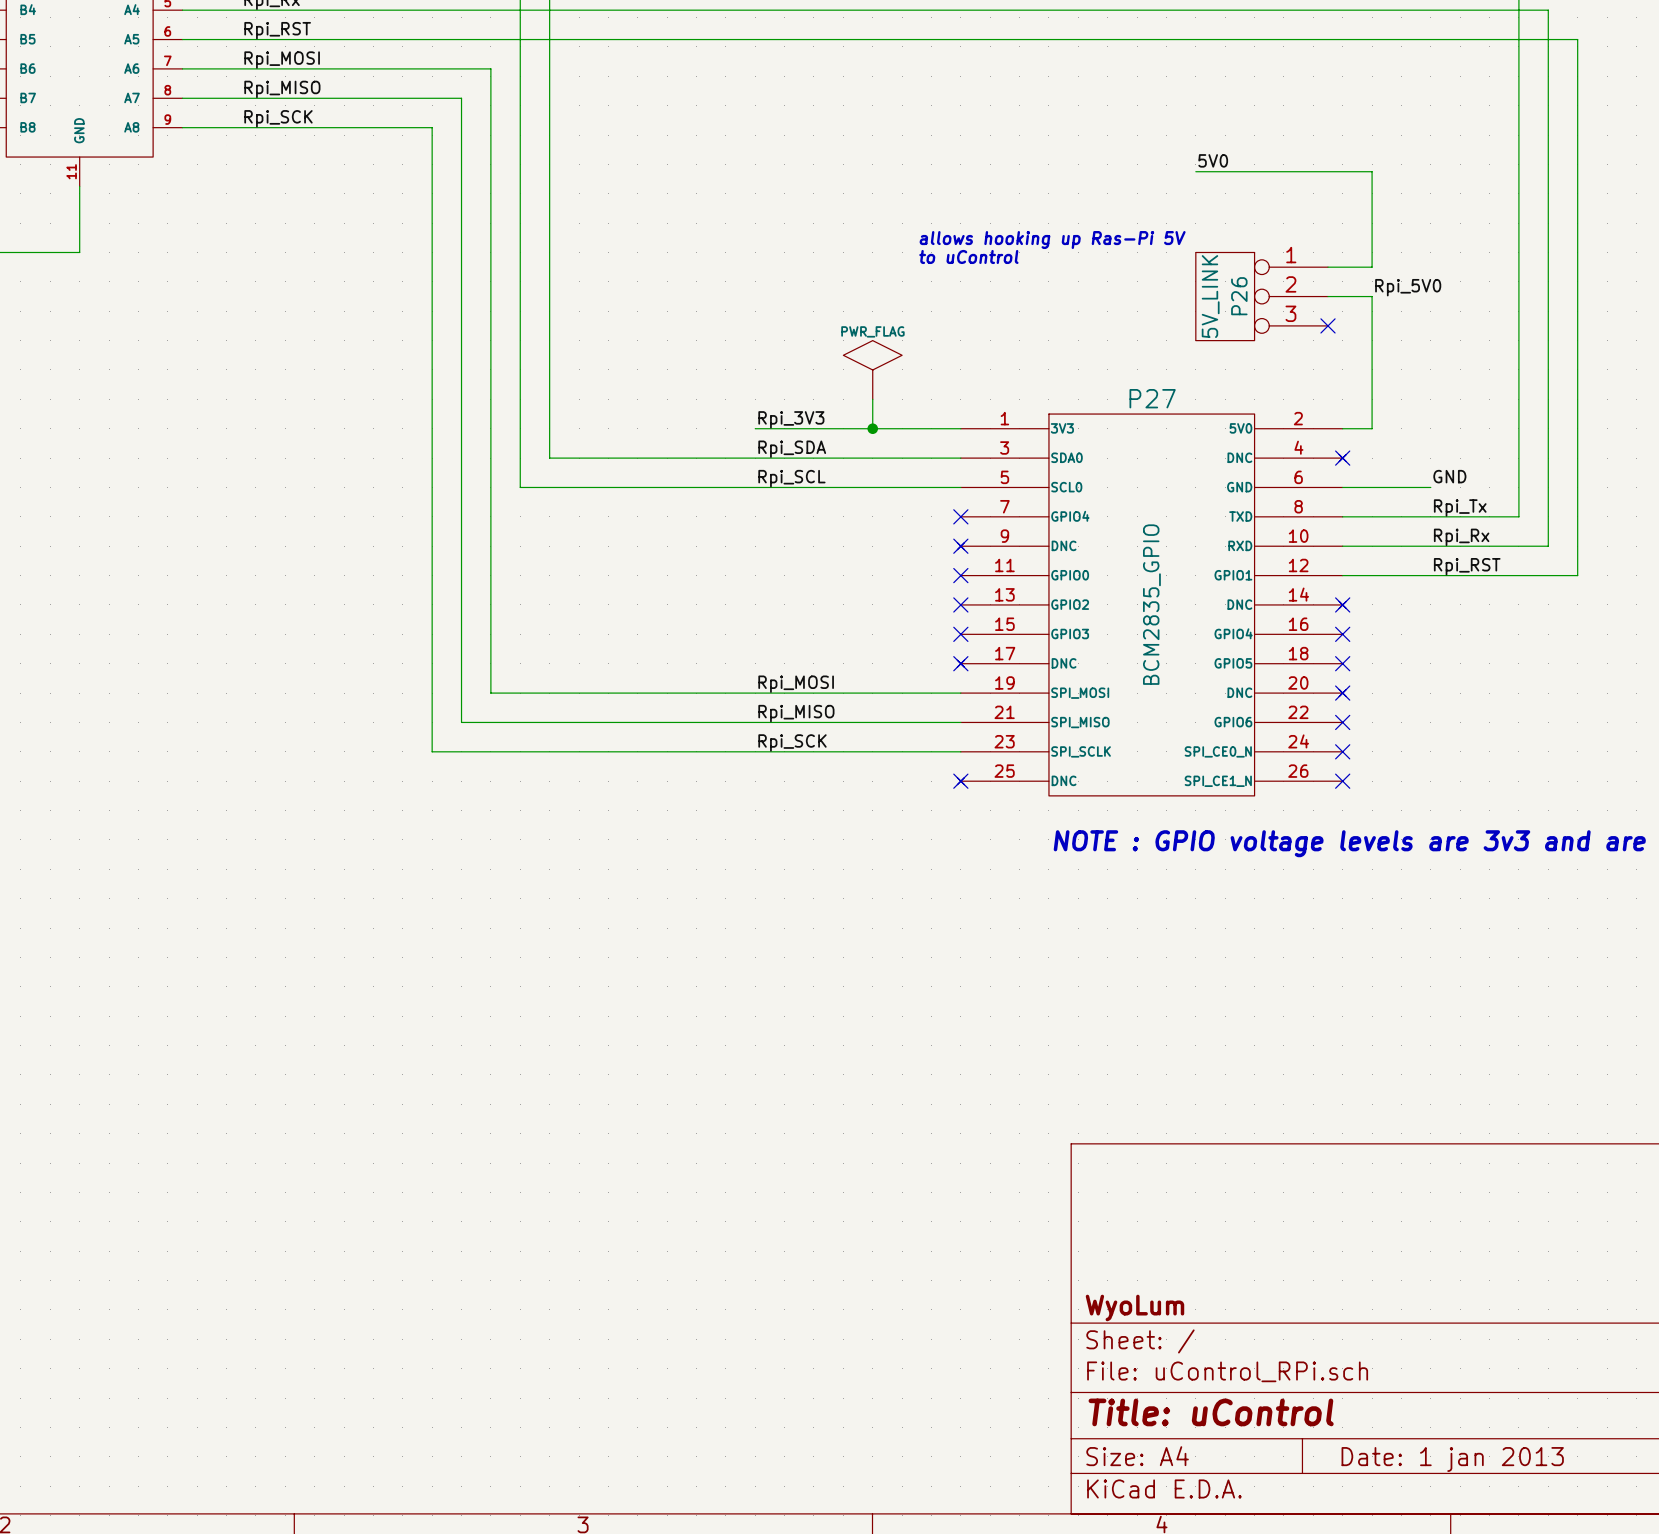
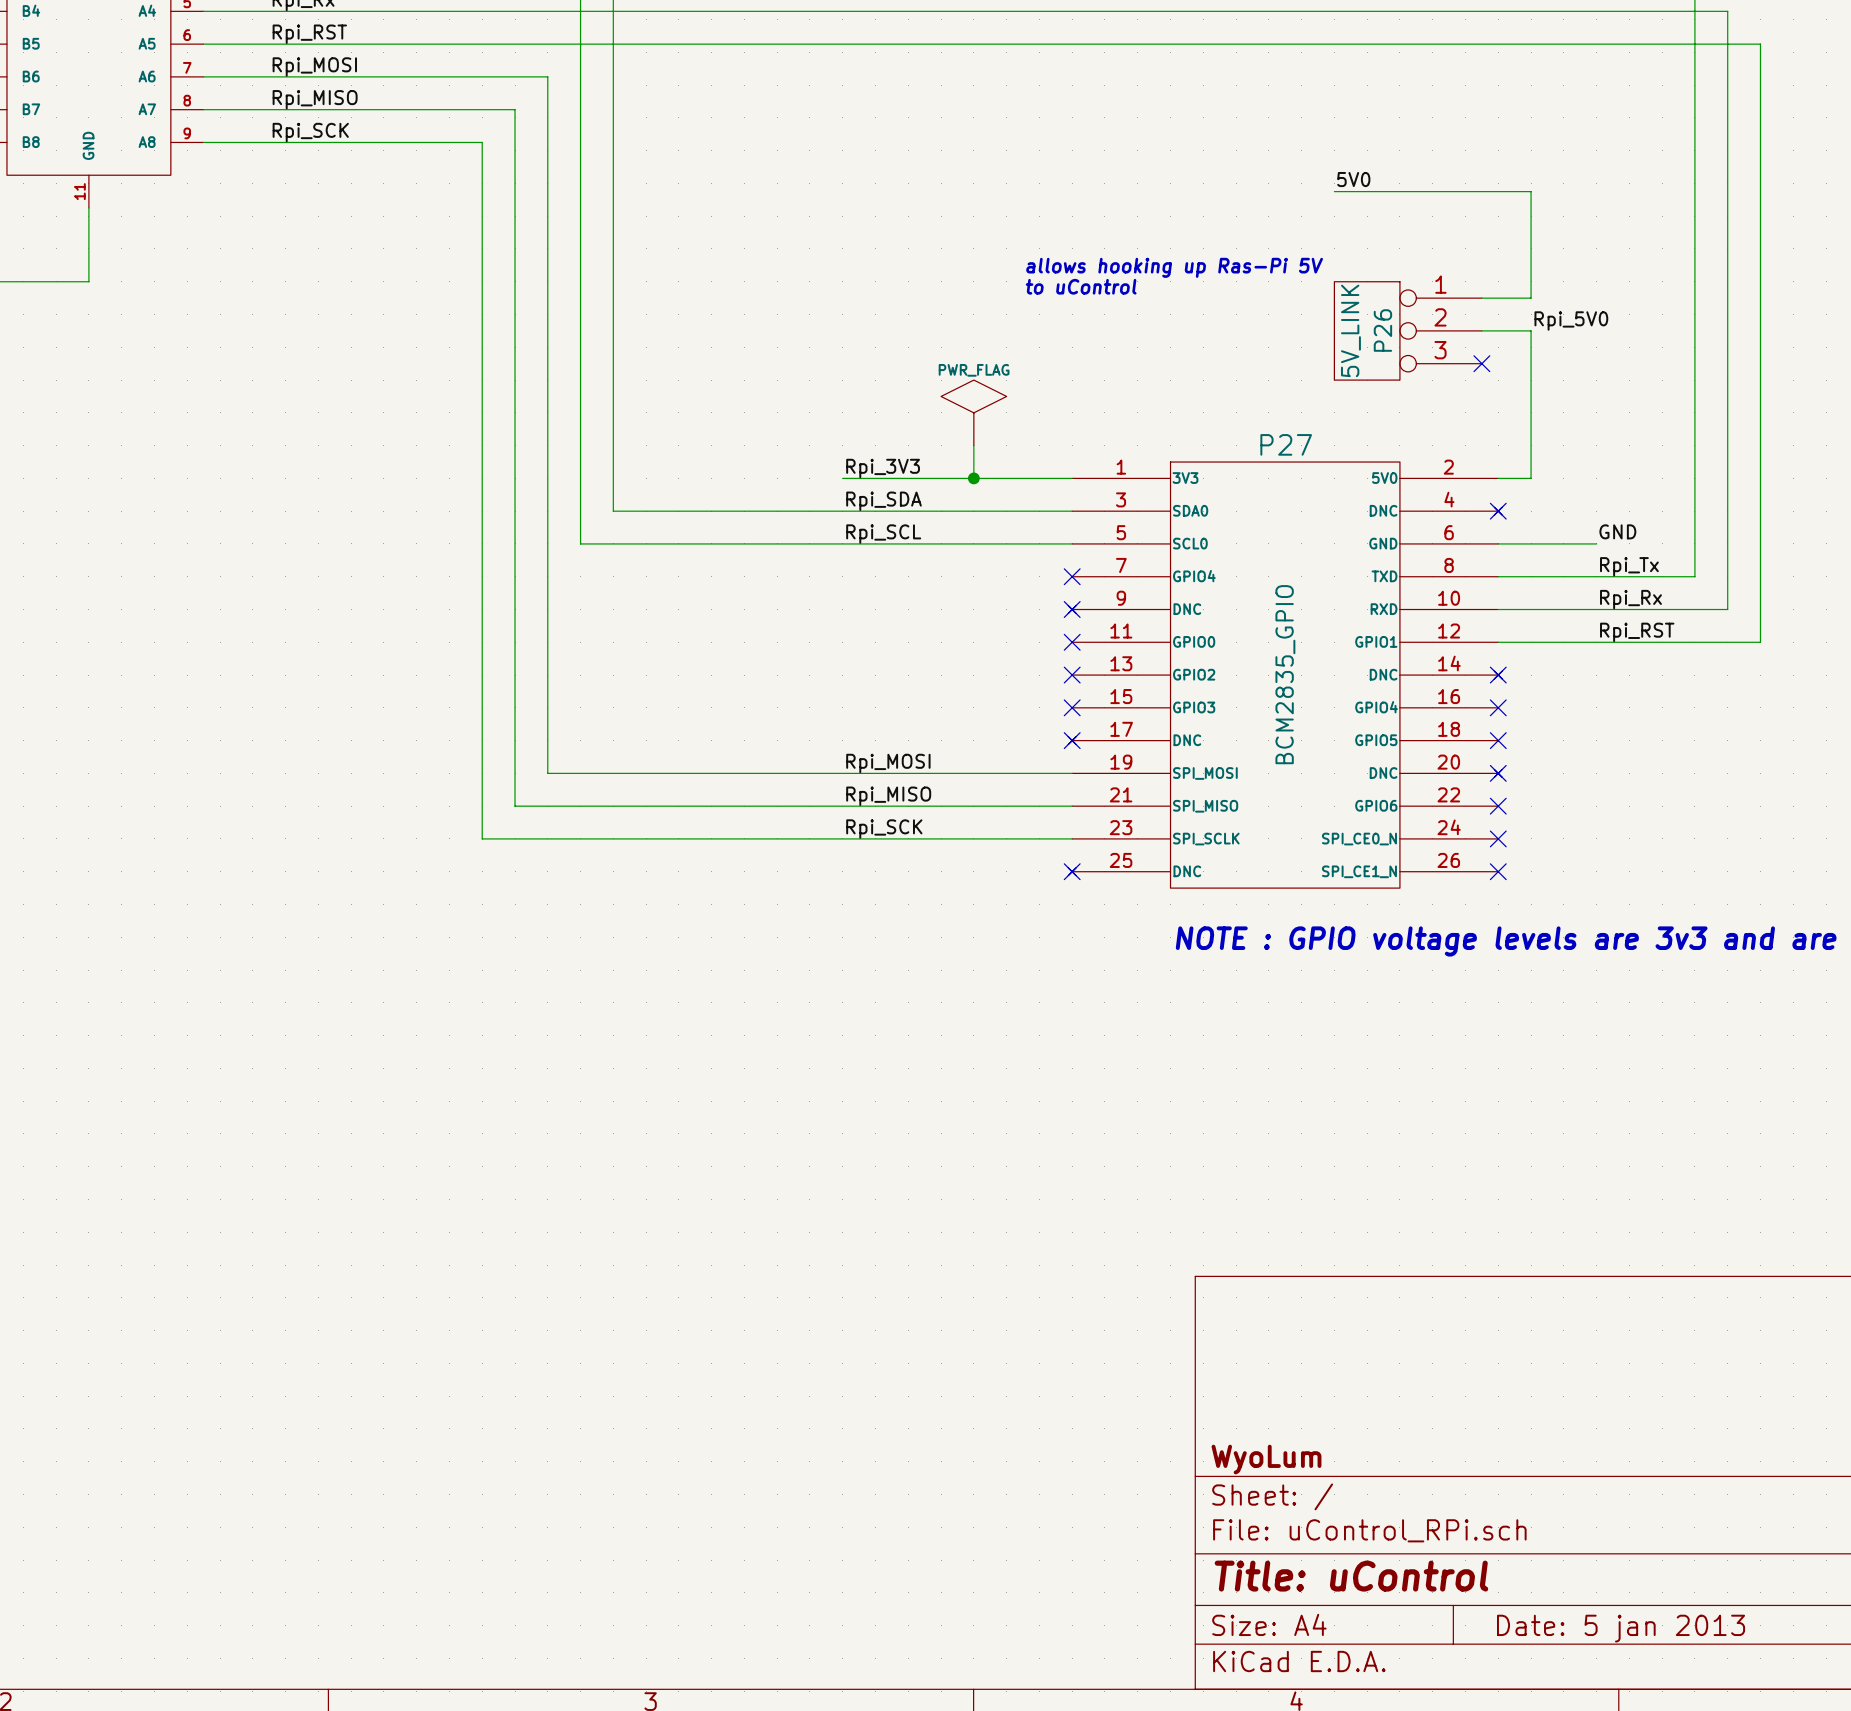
title block: Date: 1 jan 2013 (1452, 1459) -> Date: 5 jan 2013 (1621, 1628)

